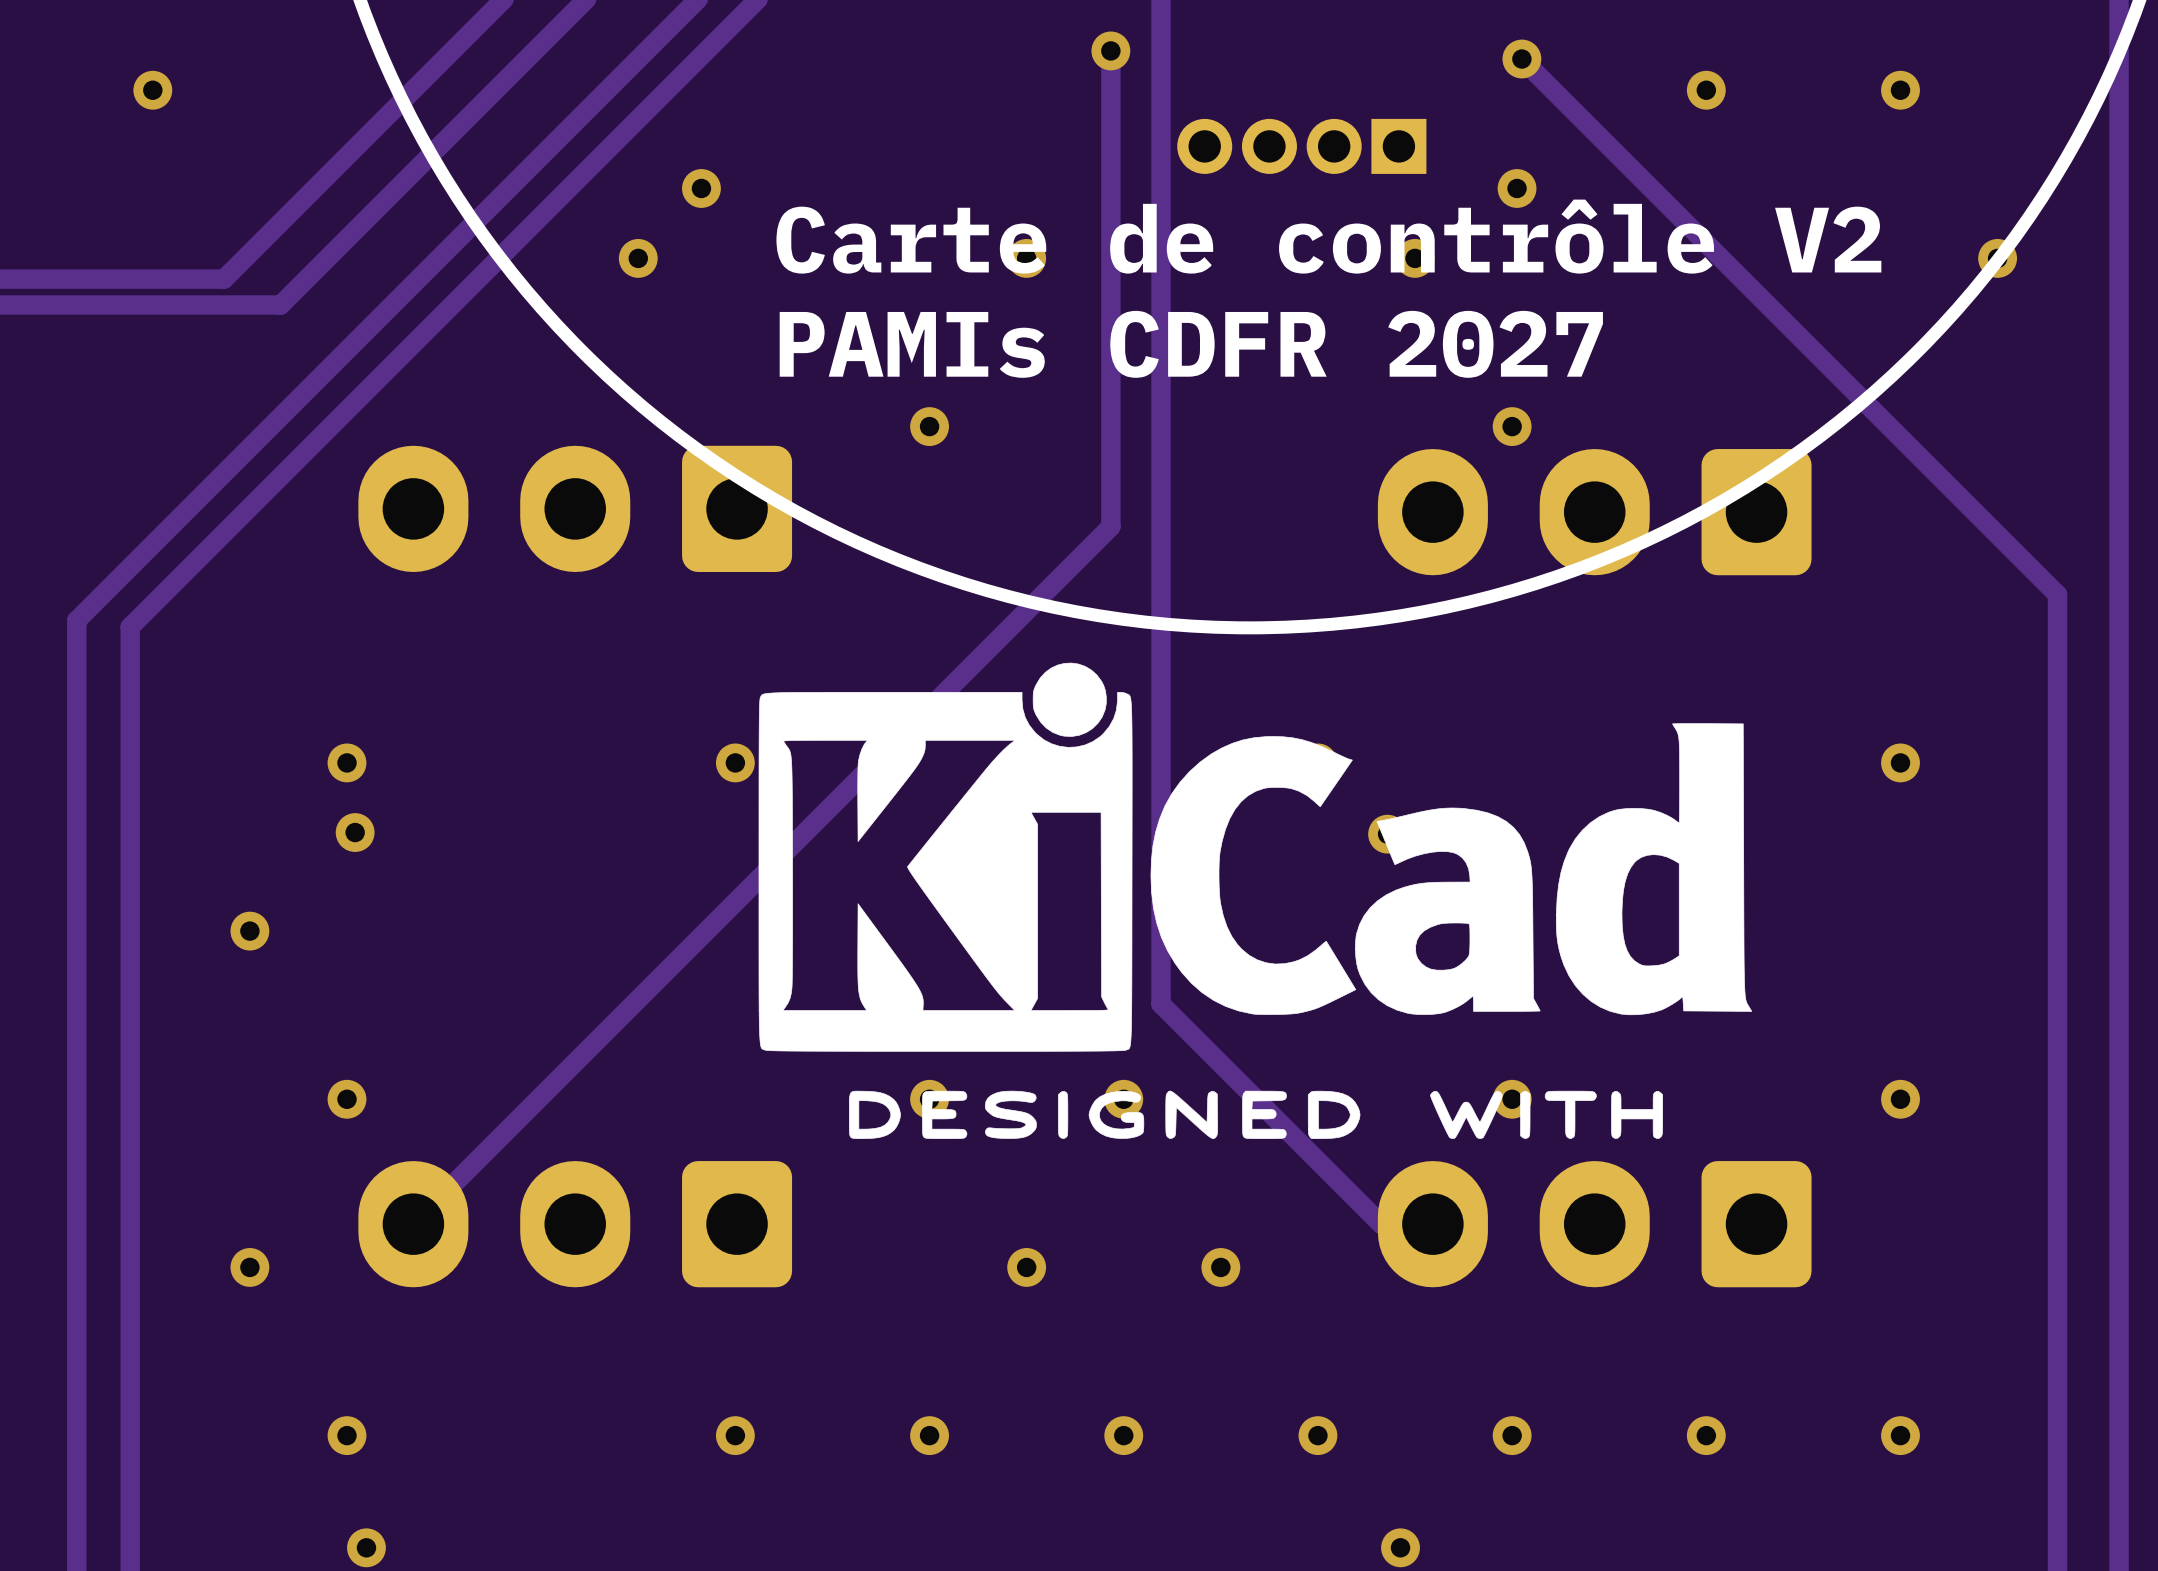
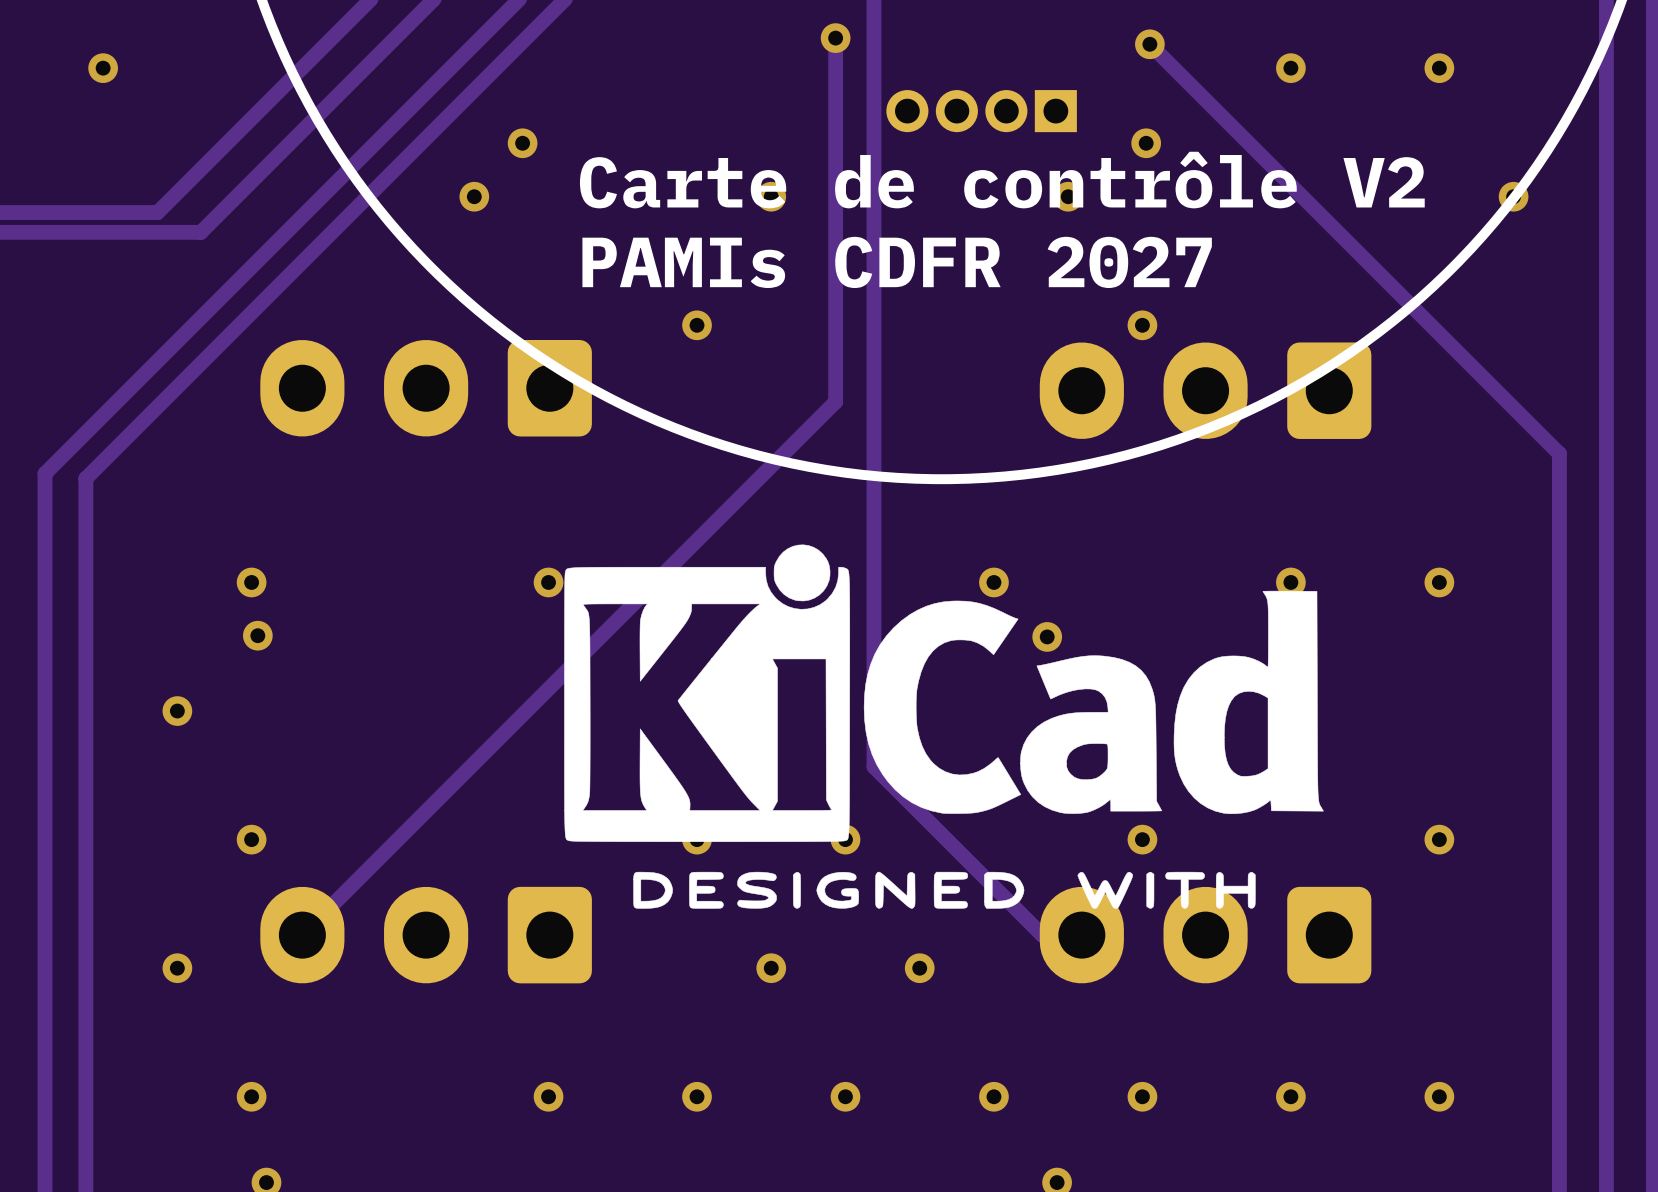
drawing position: (1255, 900) -> (943, 726)

